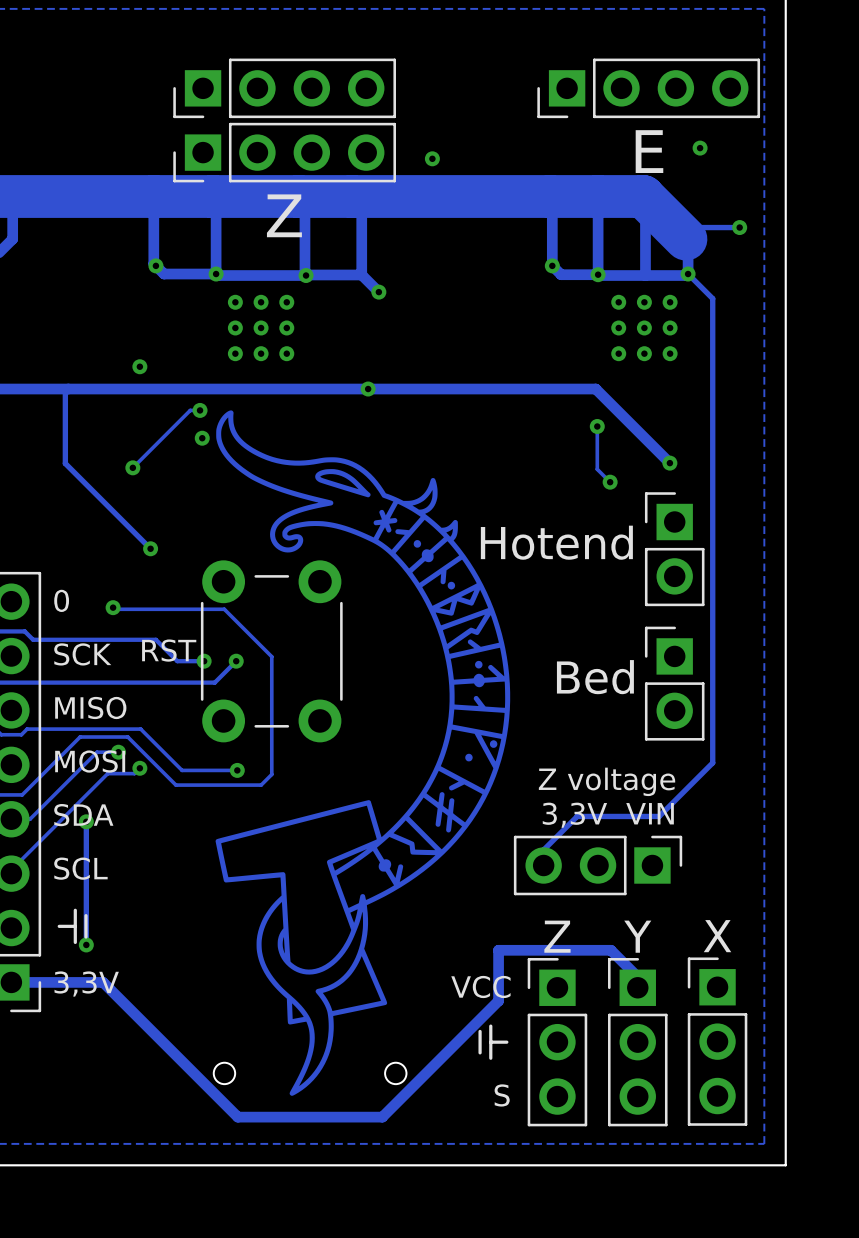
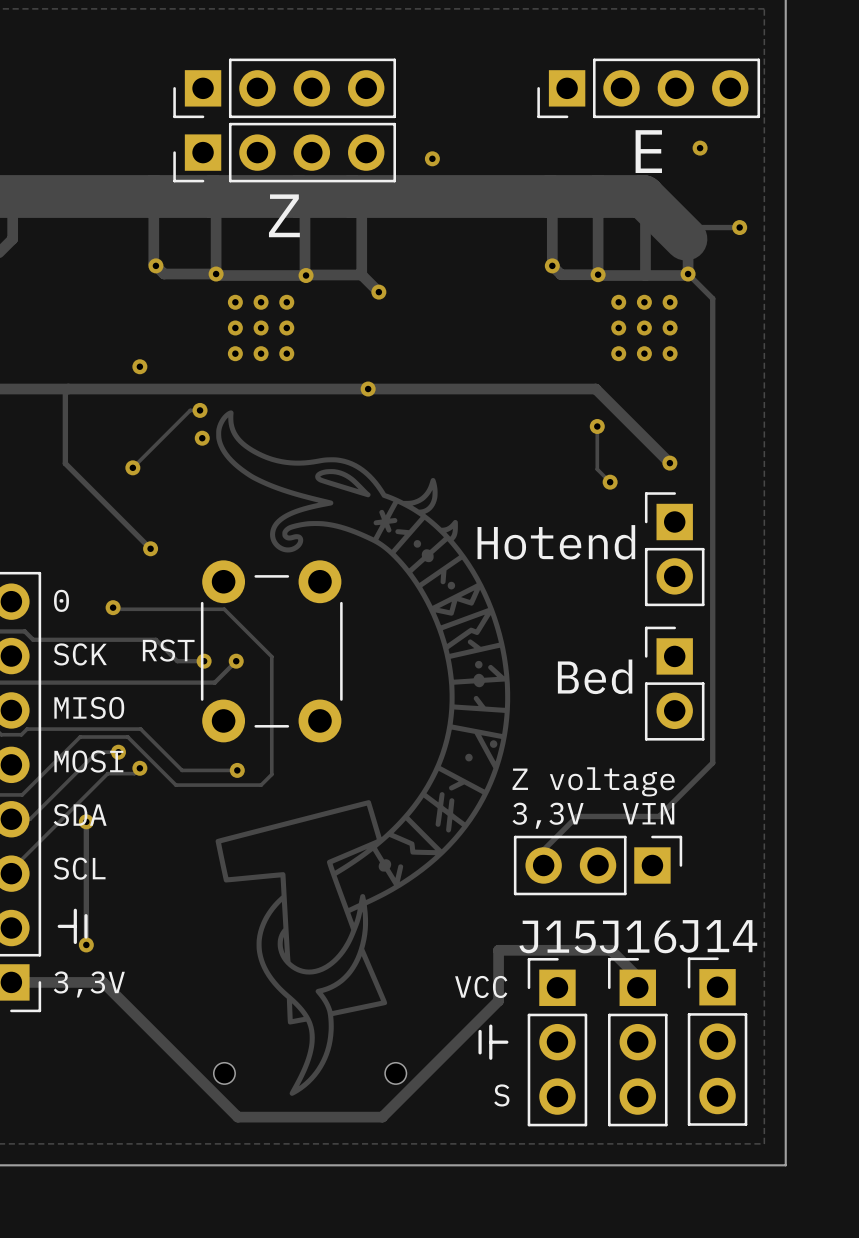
Z name: Z (557, 936) -> J15 (557, 936)
Y name: Y (637, 936) -> J16 (638, 936)
X name: X (717, 936) -> J14 (718, 936)

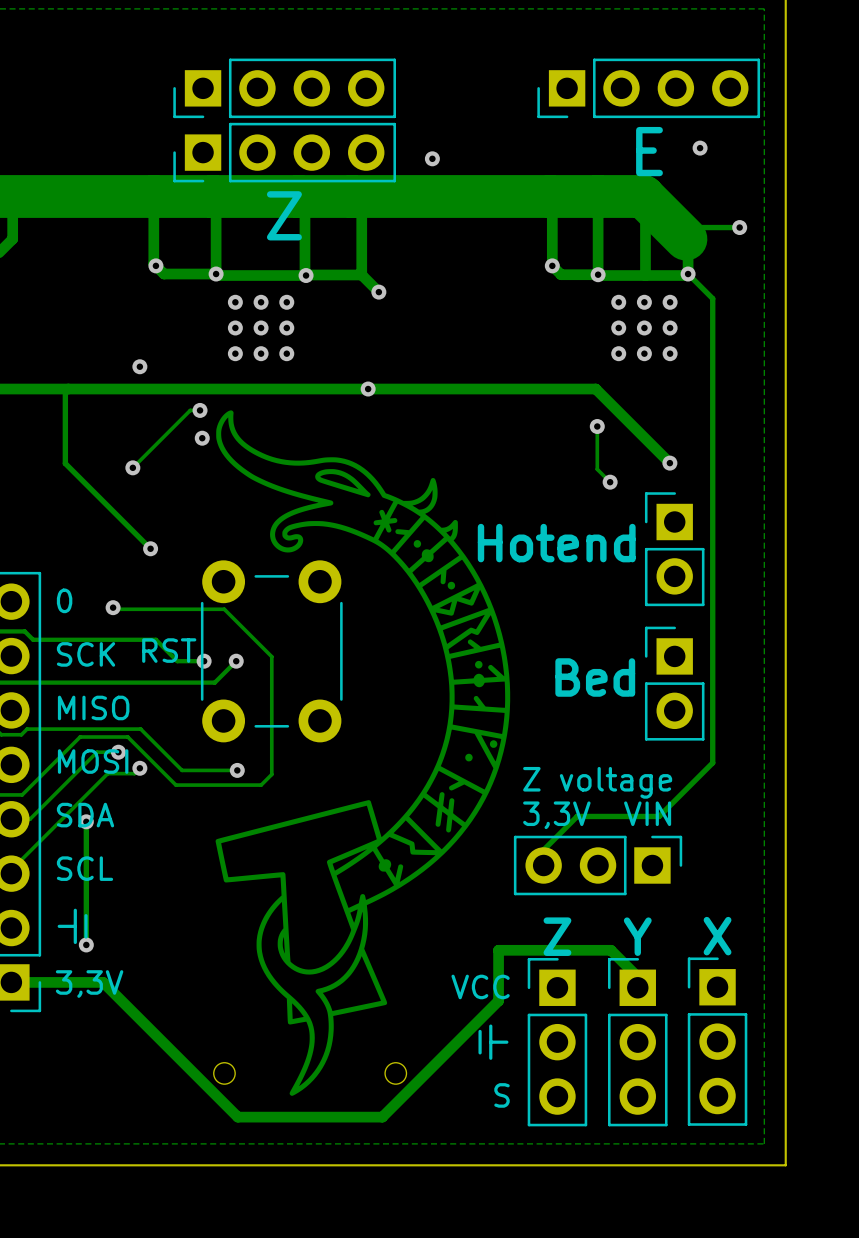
J15 name: J15 (557, 936) -> Z (557, 936)
J16 name: J16 (638, 936) -> Y (637, 936)
J14 name: J14 (718, 936) -> X (717, 936)

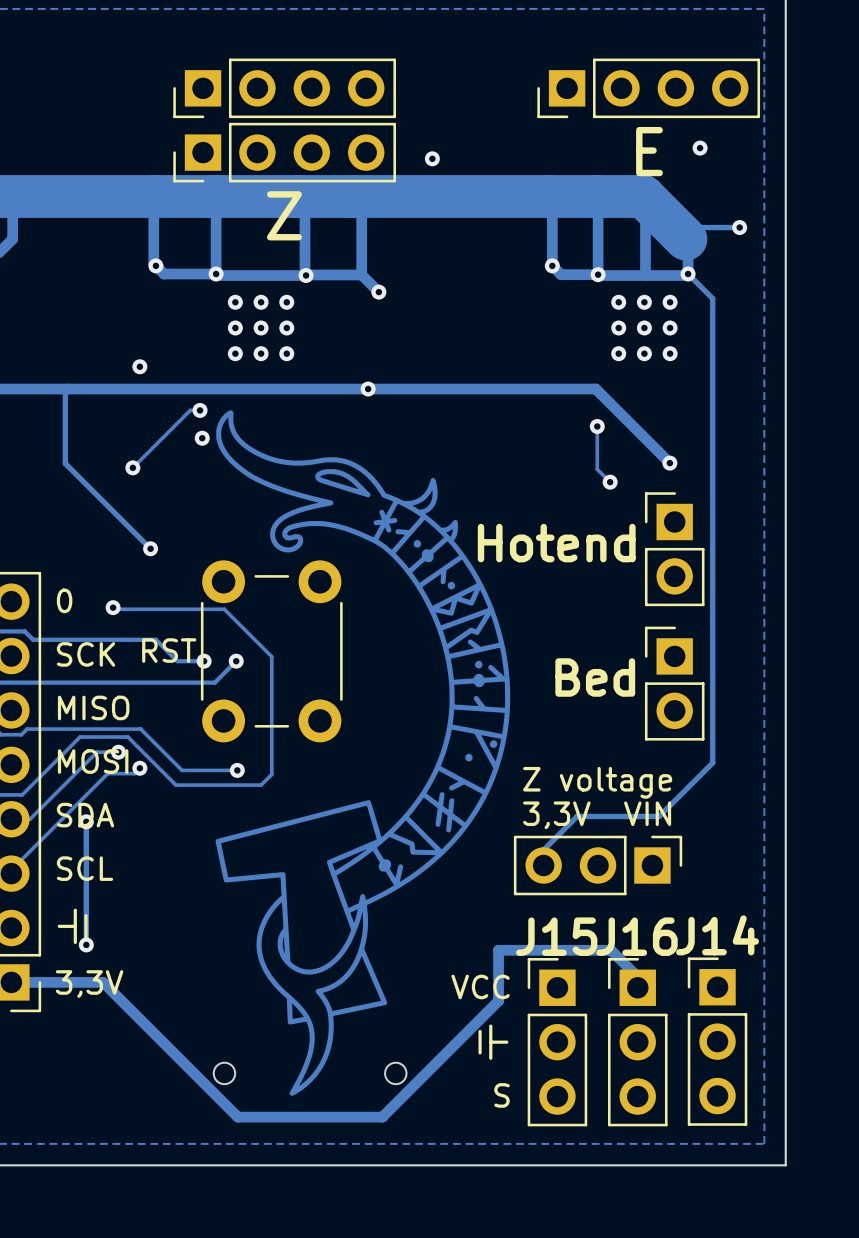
Z name: Z (557, 936) -> J15 (556, 936)
Y name: Y (637, 936) -> J16 (637, 936)
X name: X (717, 936) -> J14 (717, 935)

